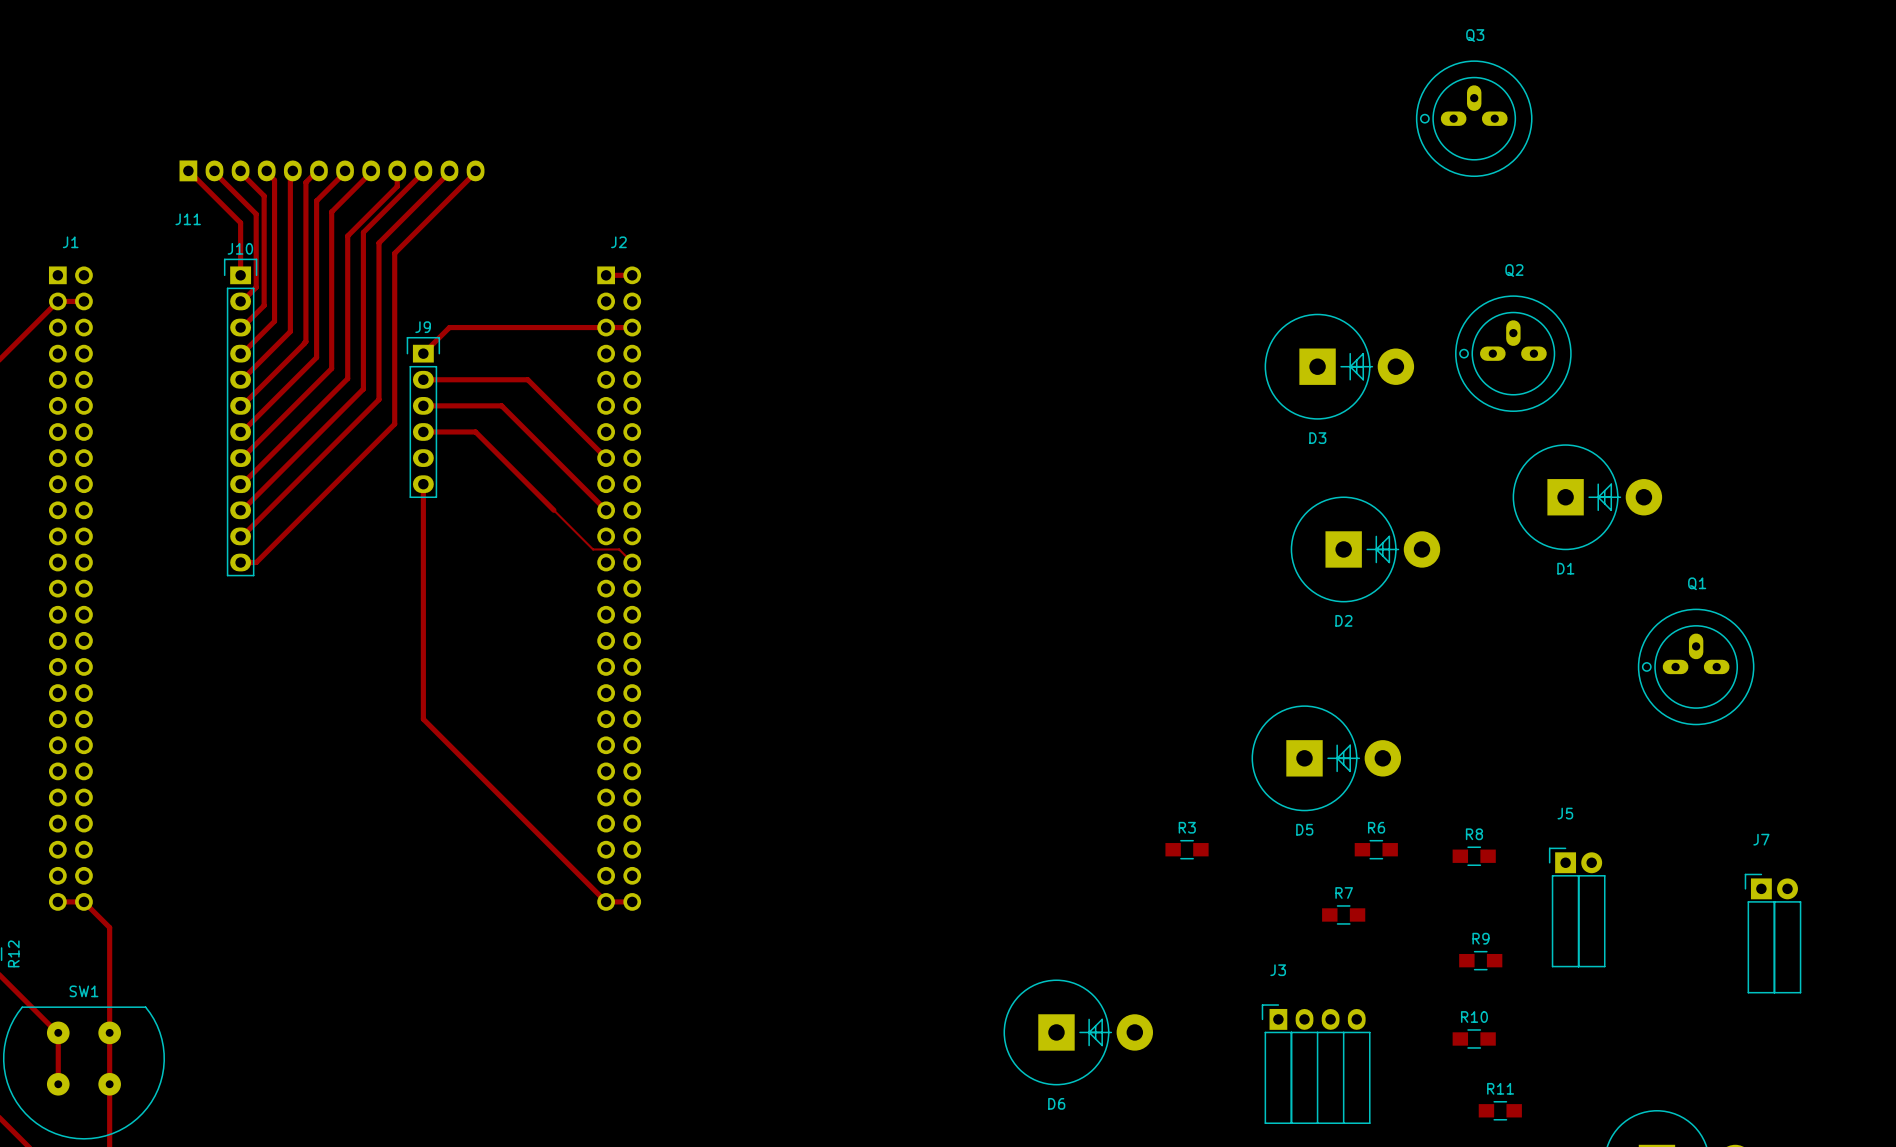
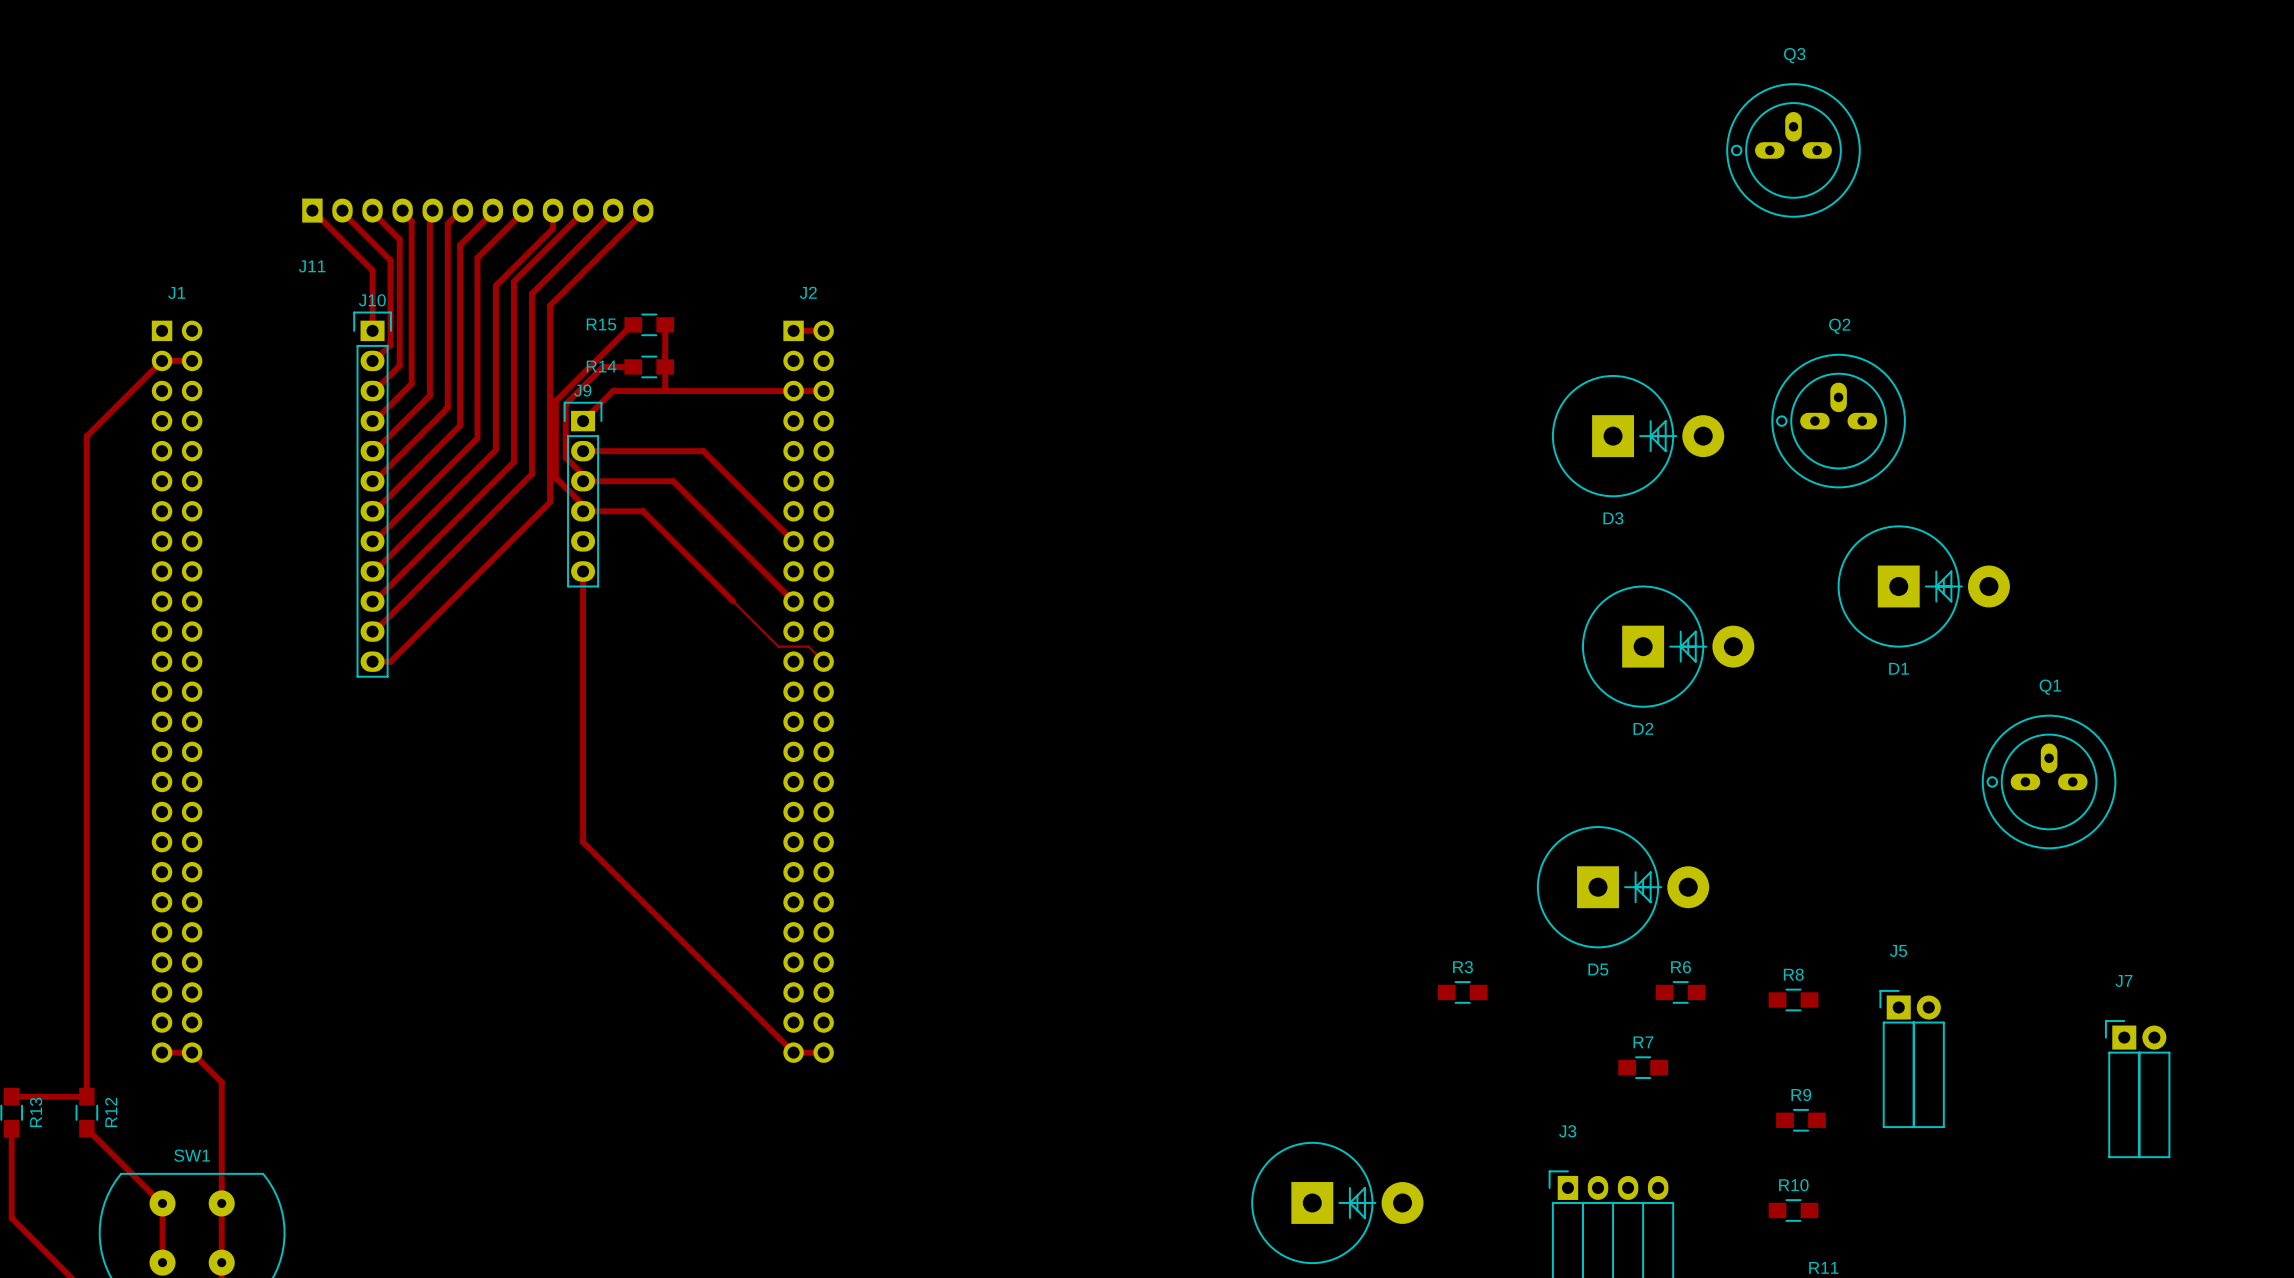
track: none -> (633, 324) (555, 401) (555, 477) (583, 505) (583, 511)
R15: none -> (649, 324)
track: none -> (665, 324) (665, 388) (667, 391)
track: none -> (633, 366) (602, 366) (565, 404) (565, 457) (583, 474) (583, 481)
R14: none -> (649, 366)

